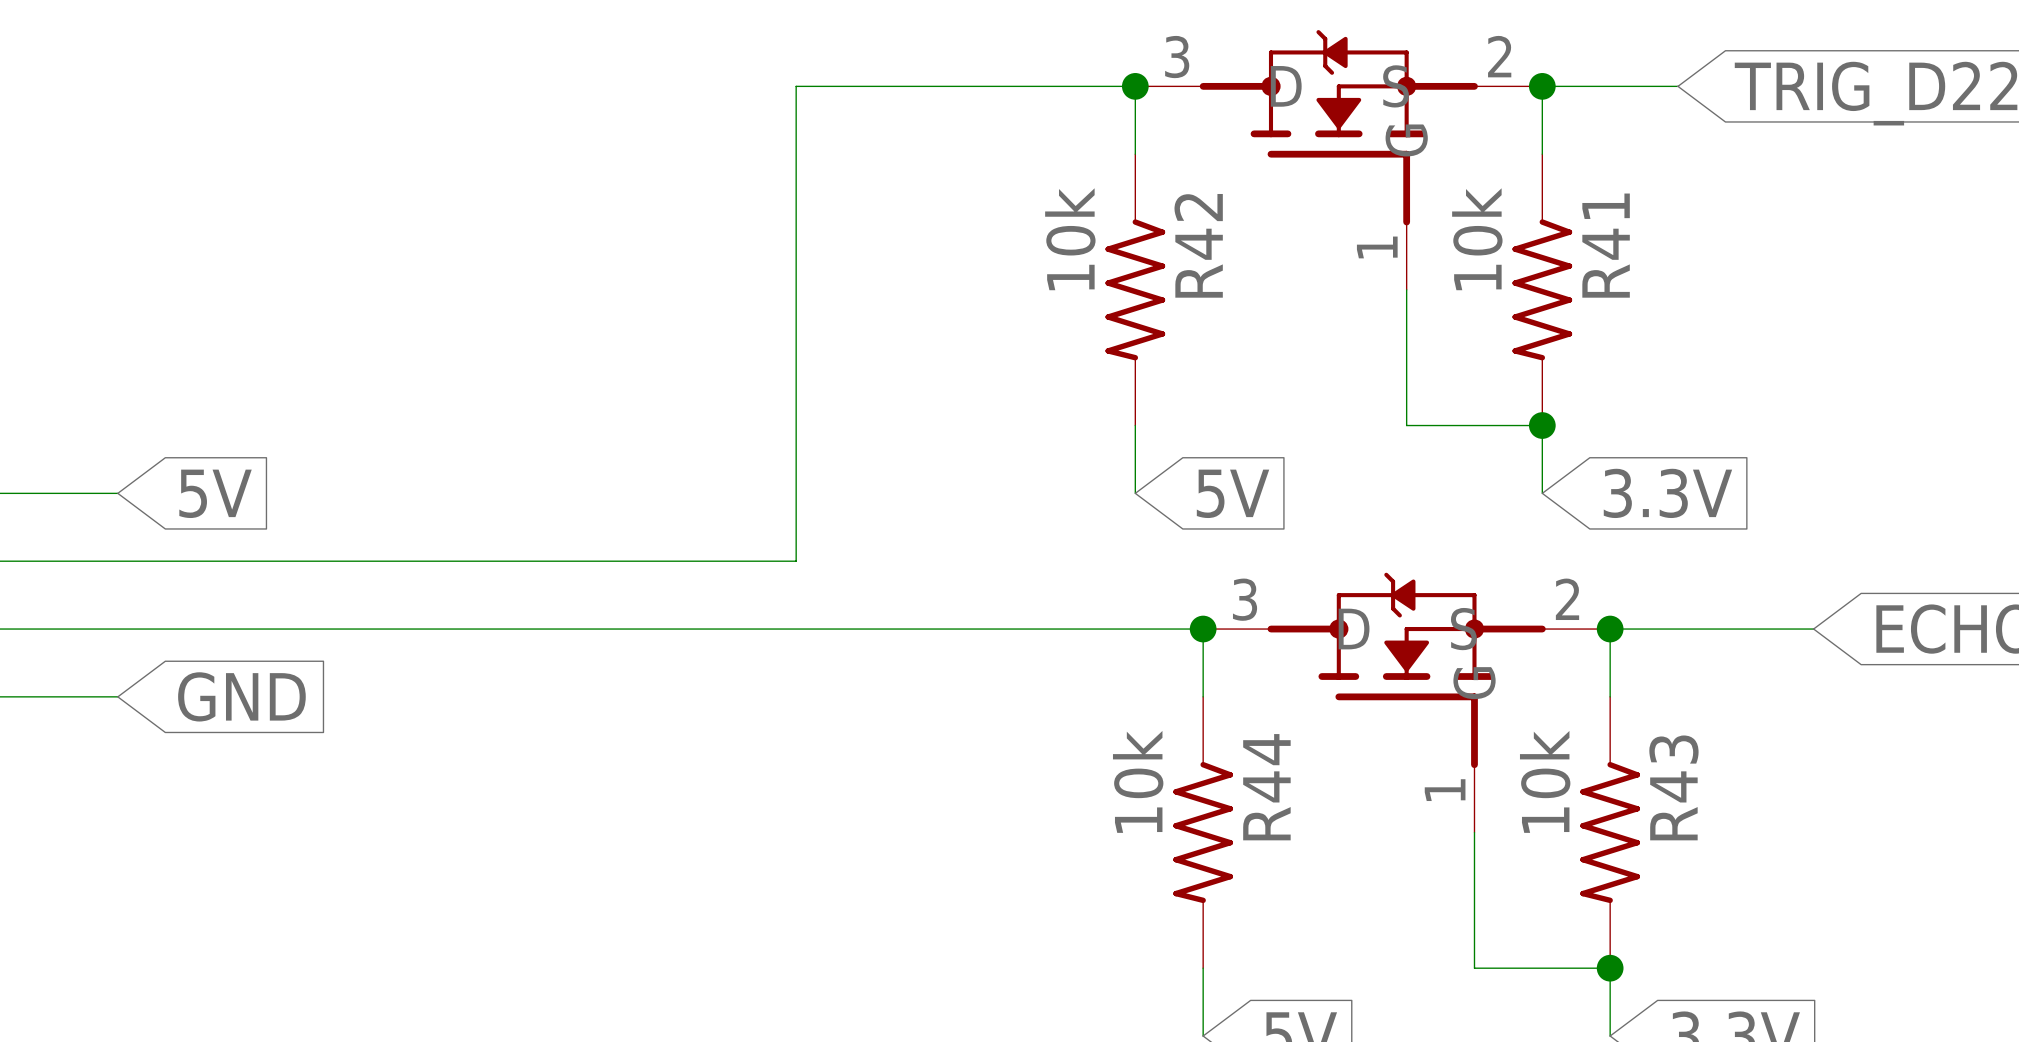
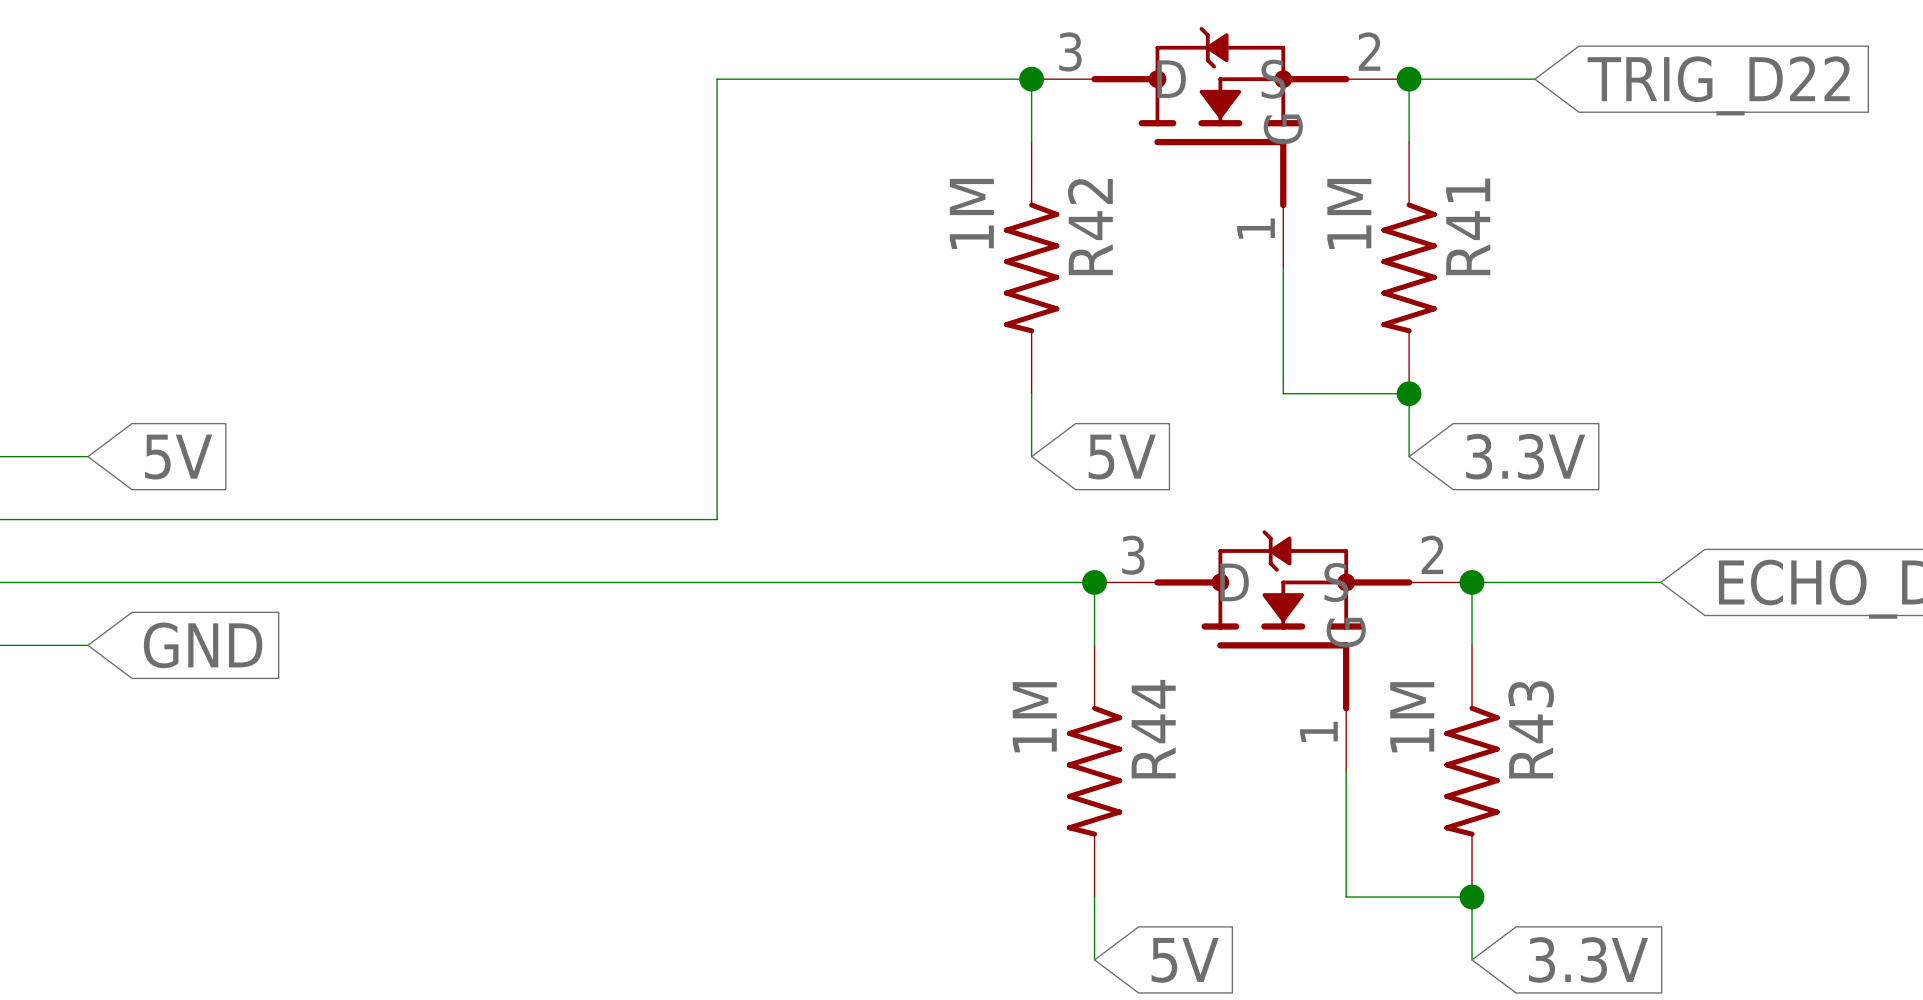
R42 value: 10k (1070, 239) -> 1M (971, 213)
R41 value: 10k (1477, 239) -> 1M (1349, 213)
R44 value: 10k (1138, 781) -> 1M (1034, 717)
R43 value: 10k (1545, 781) -> 1M (1412, 717)

